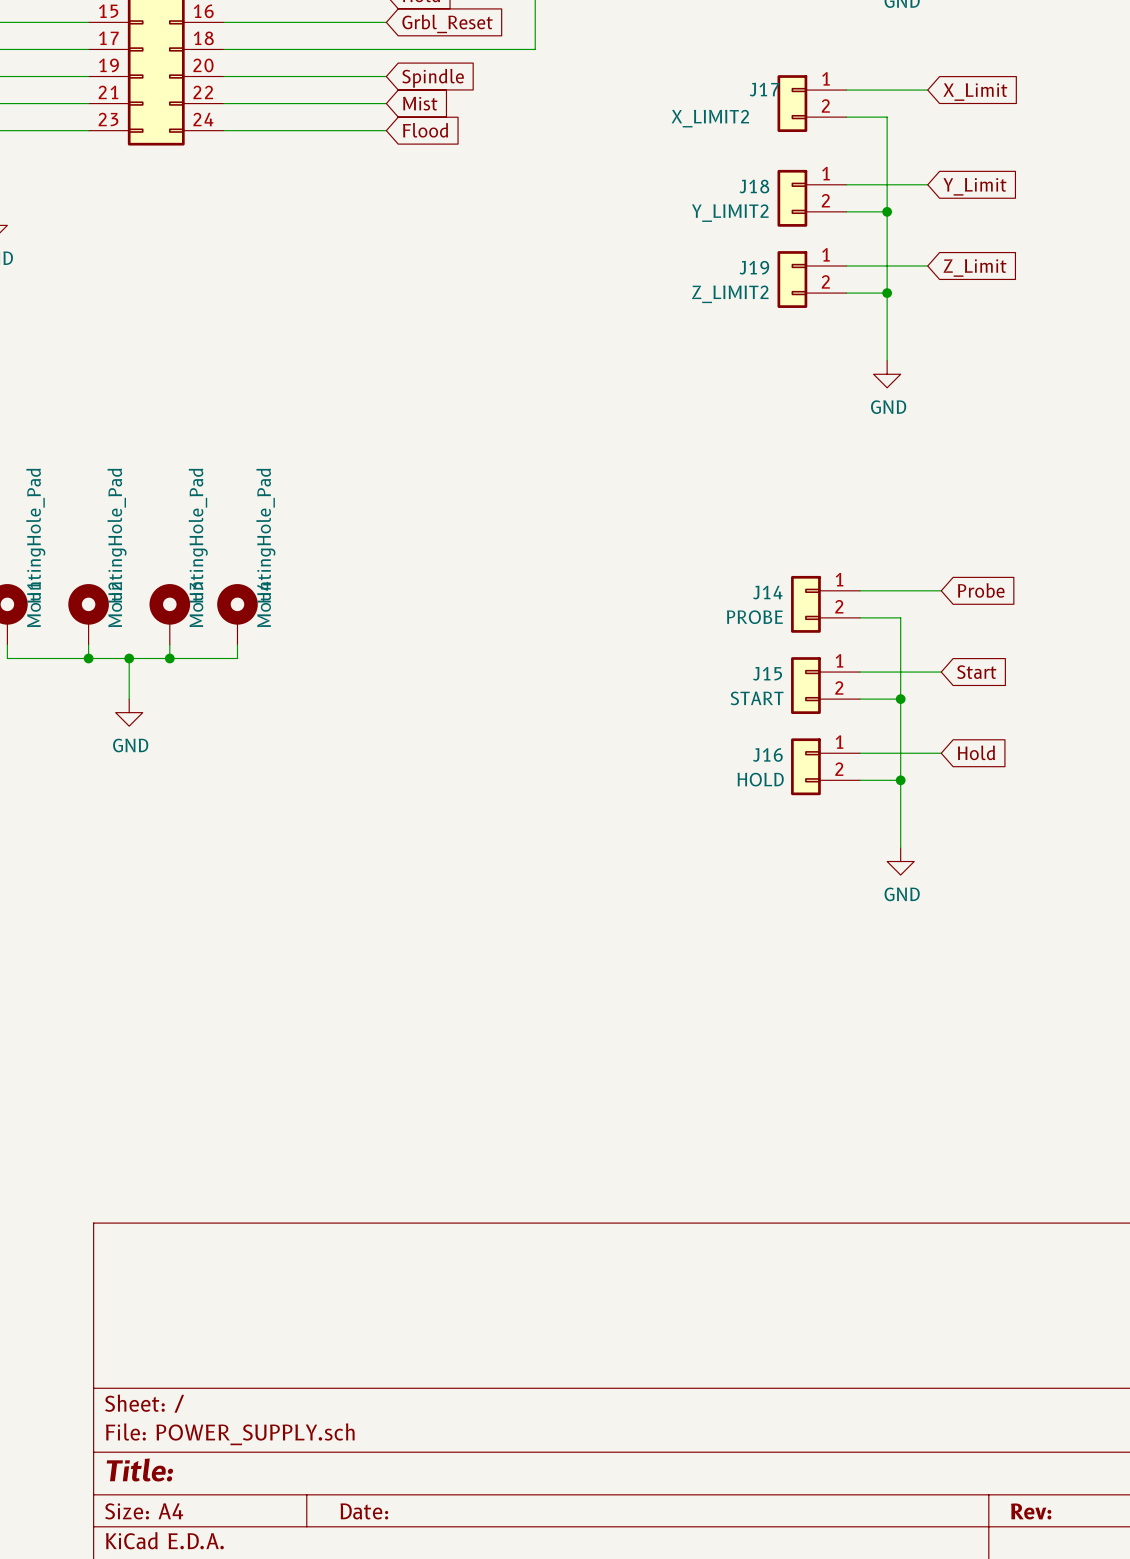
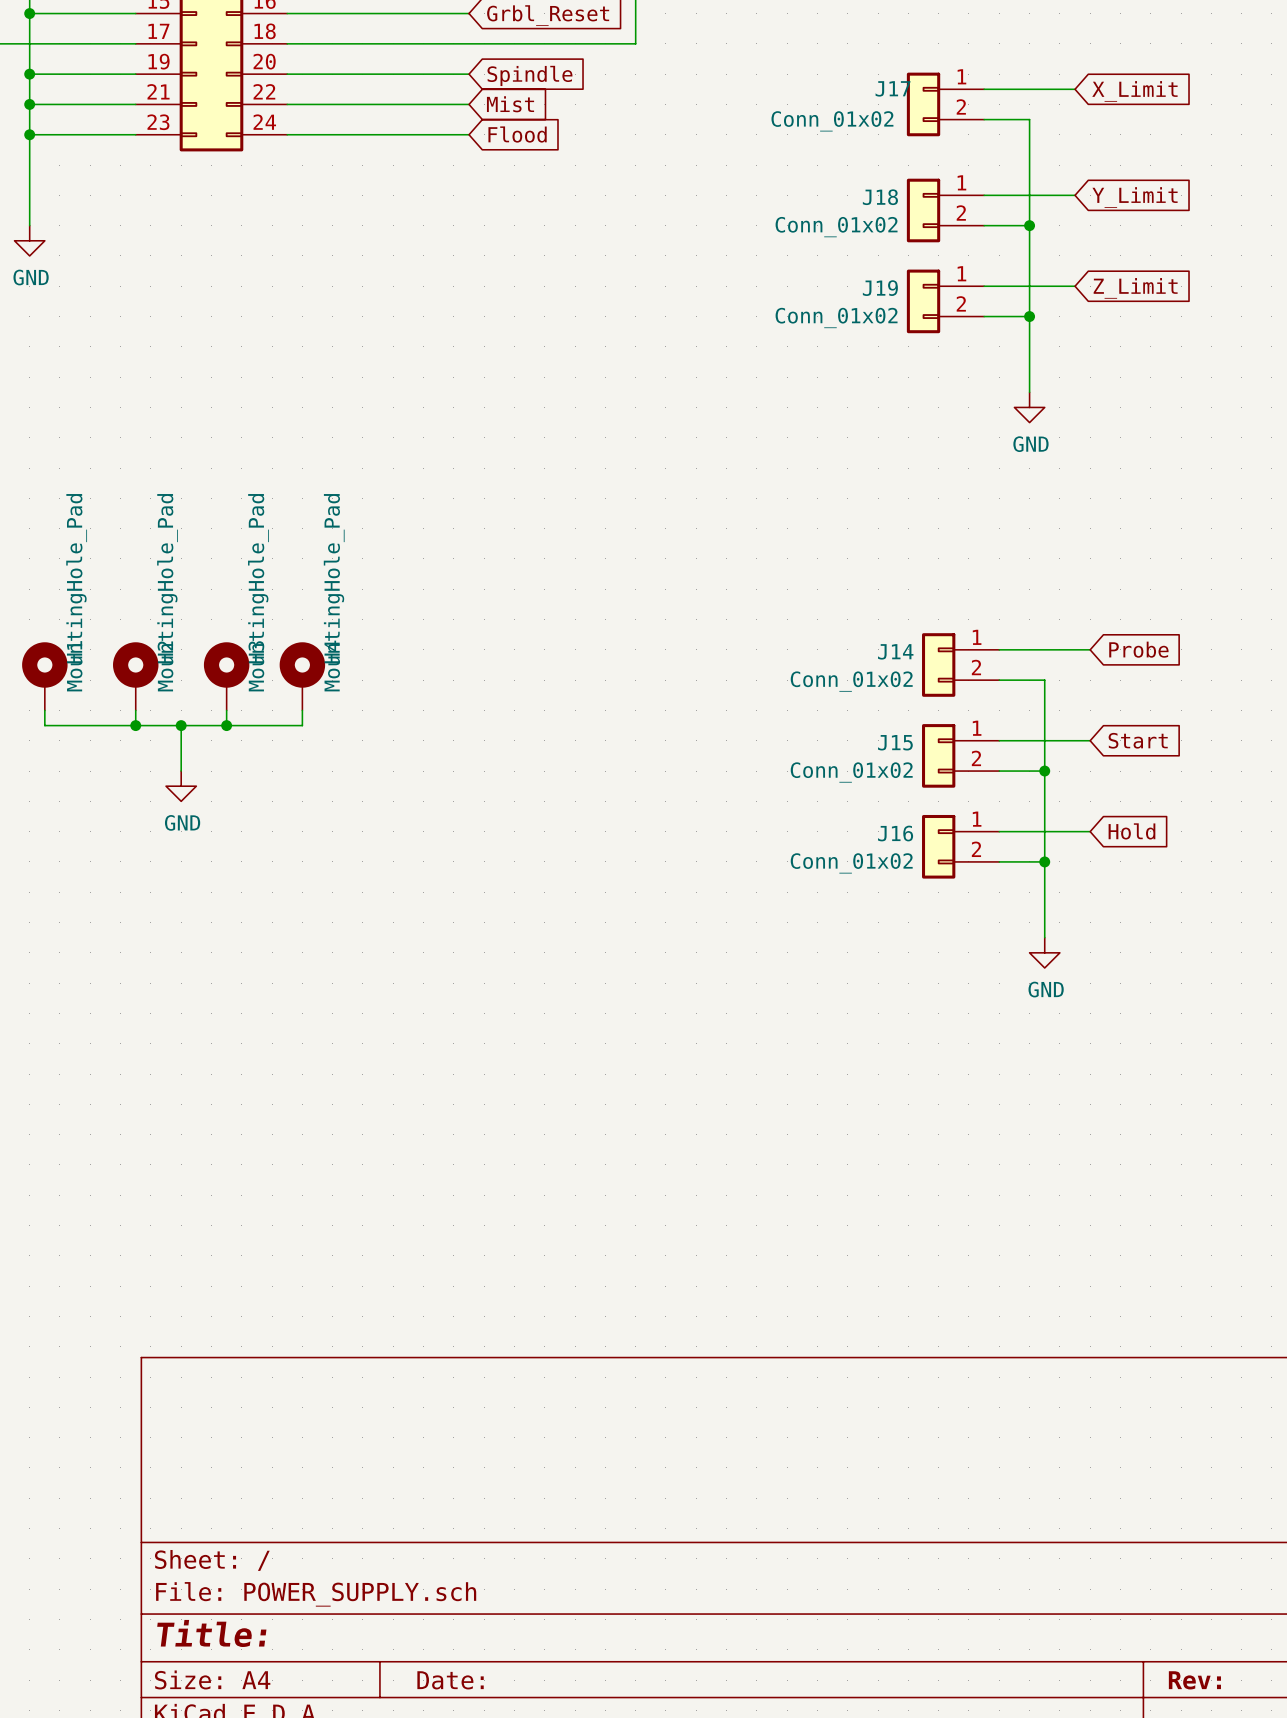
J17 value: X_LIMIT2 (710, 118) -> Conn_01x02 (832, 121)
J18 value: Y_LIMIT2 (730, 213) -> Conn_01x02 (836, 227)
J19 value: Z_LIMIT2 (730, 294) -> Conn_01x02 (836, 317)
J14 value: PROBE (754, 617) -> Conn_01x02 (851, 681)
J15 value: START (757, 698) -> Conn_01x02 (851, 772)
J16 value: HOLD (760, 779) -> Conn_01x02 (851, 863)

